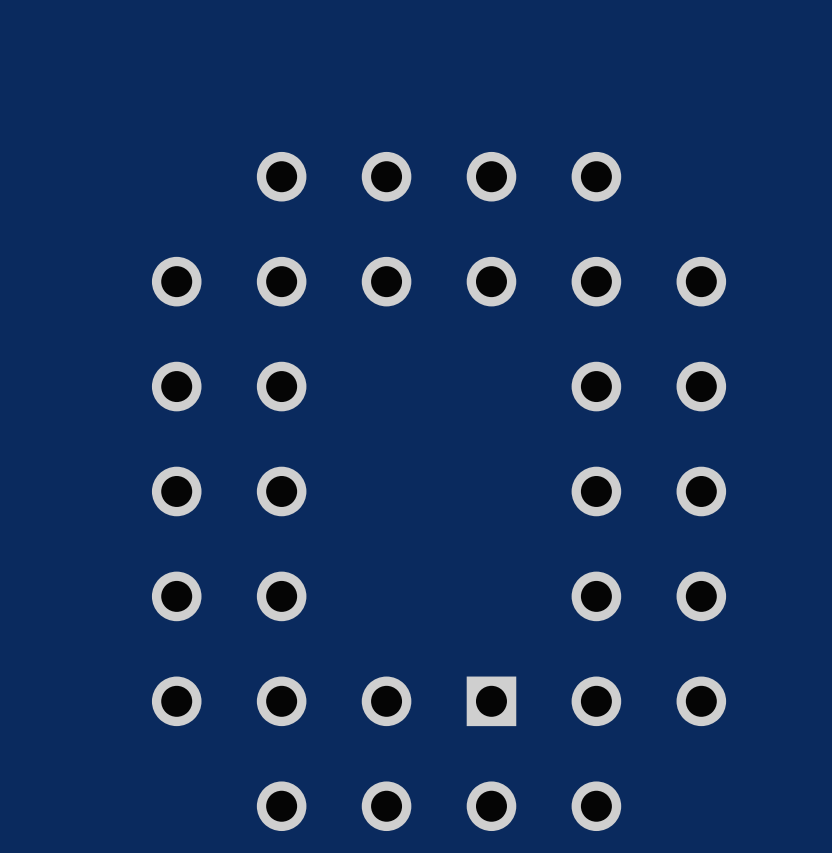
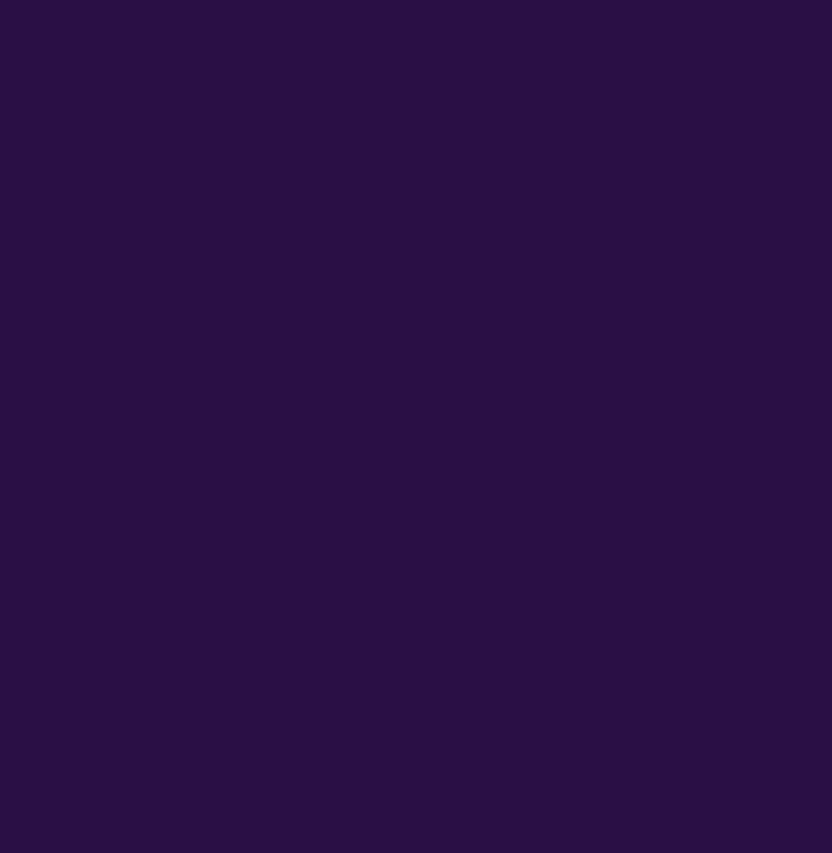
part: (439, 491) -> none

